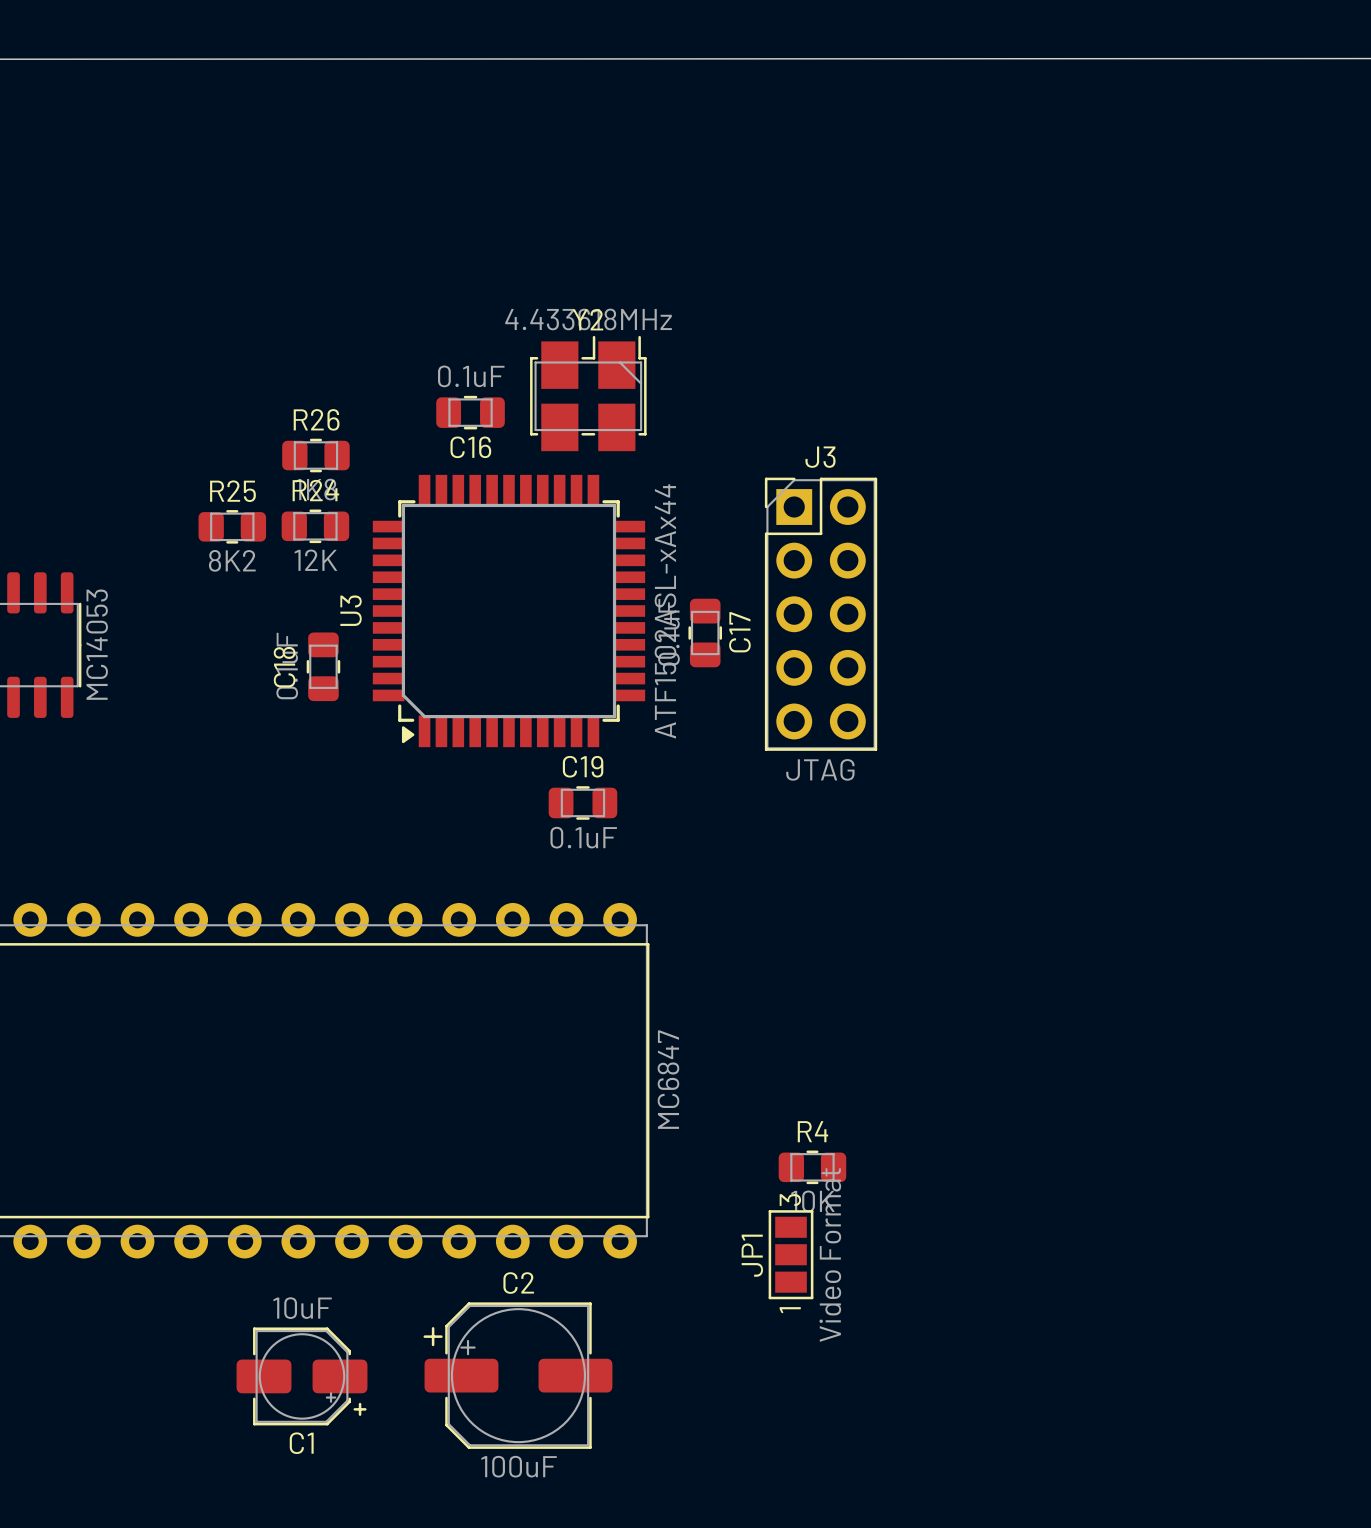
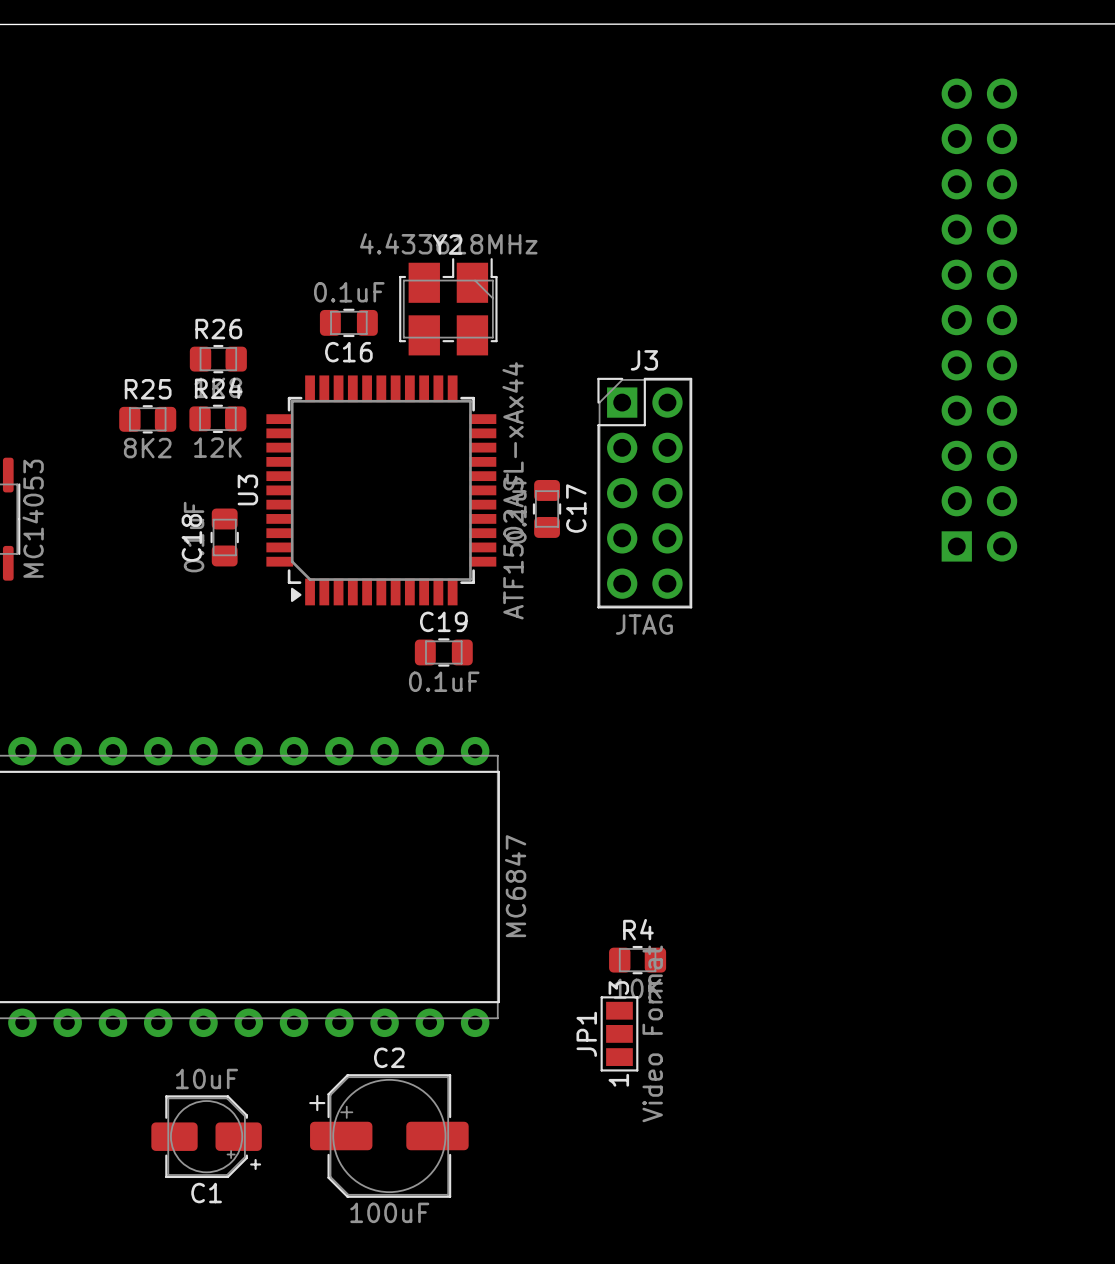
part: none -> (979, 320)

